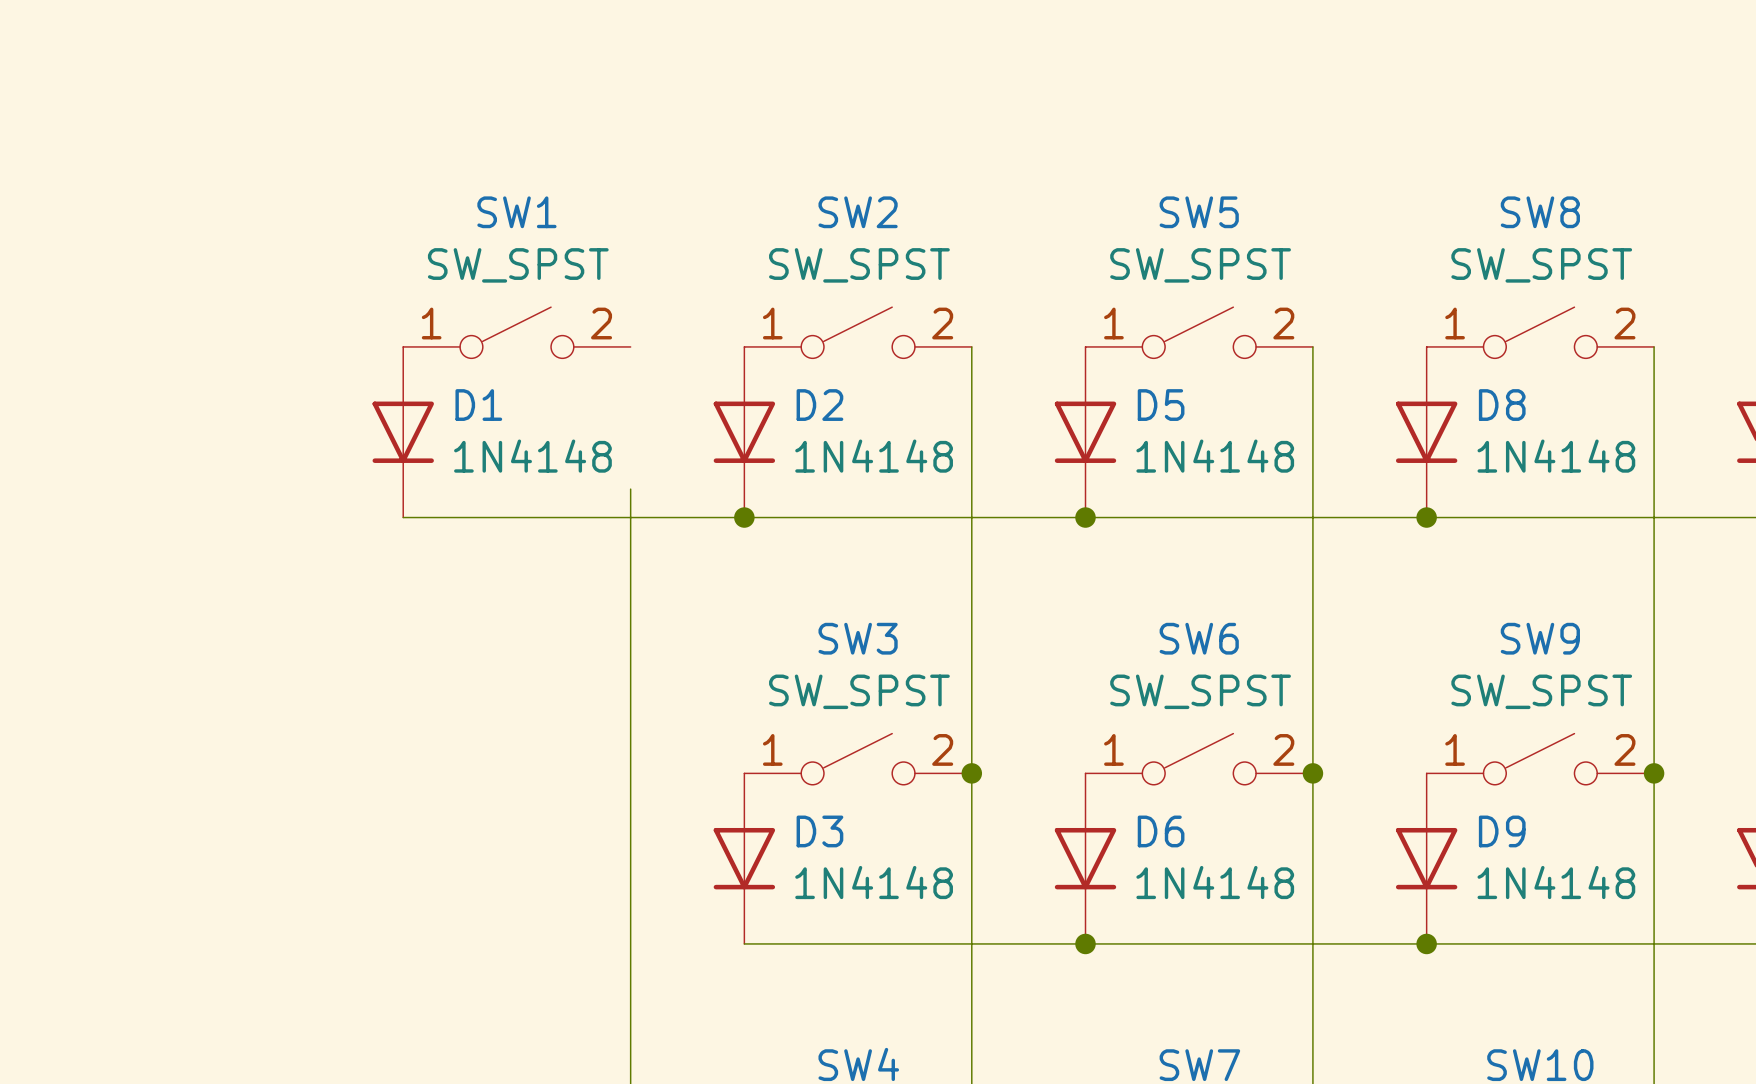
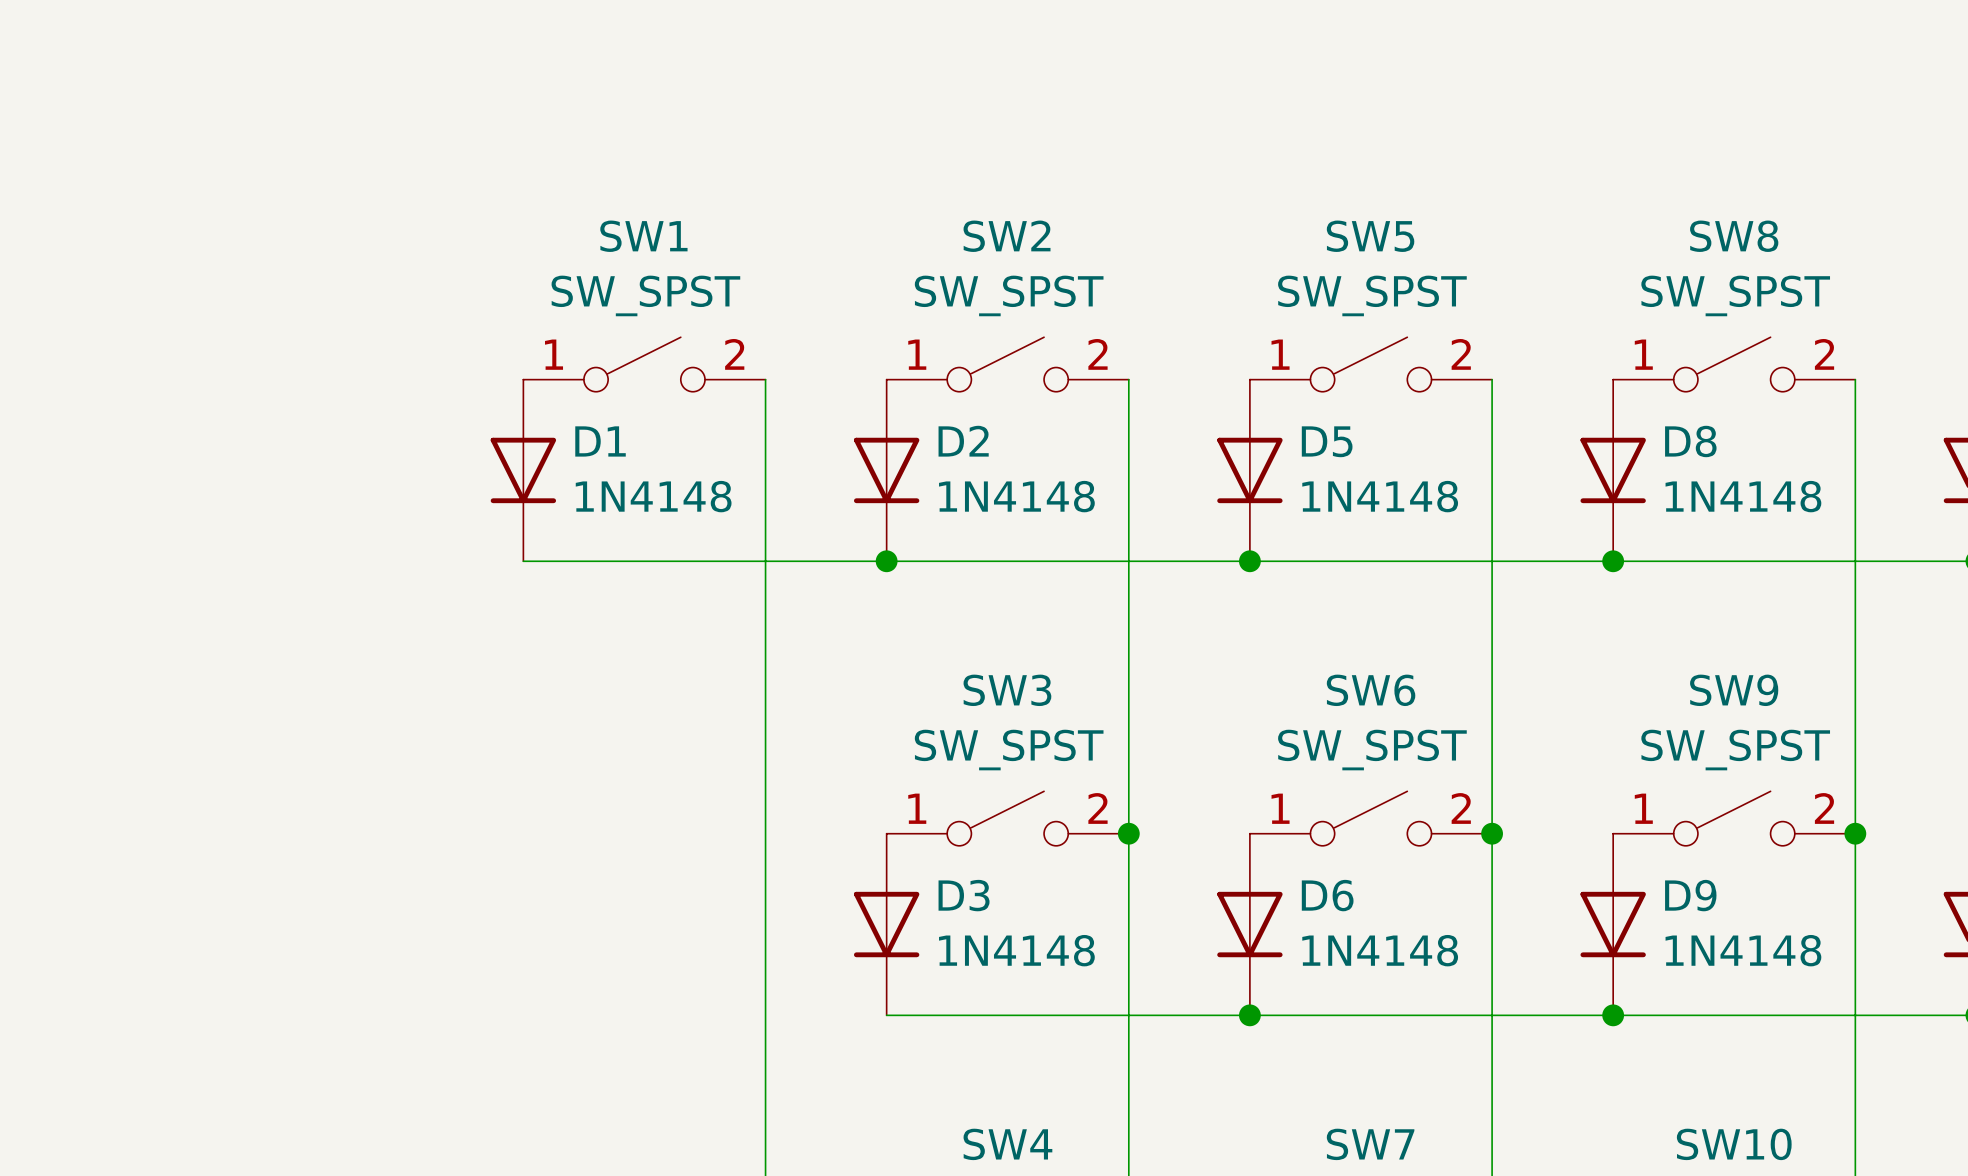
wire: none -> (765, 379) (765, 530)

